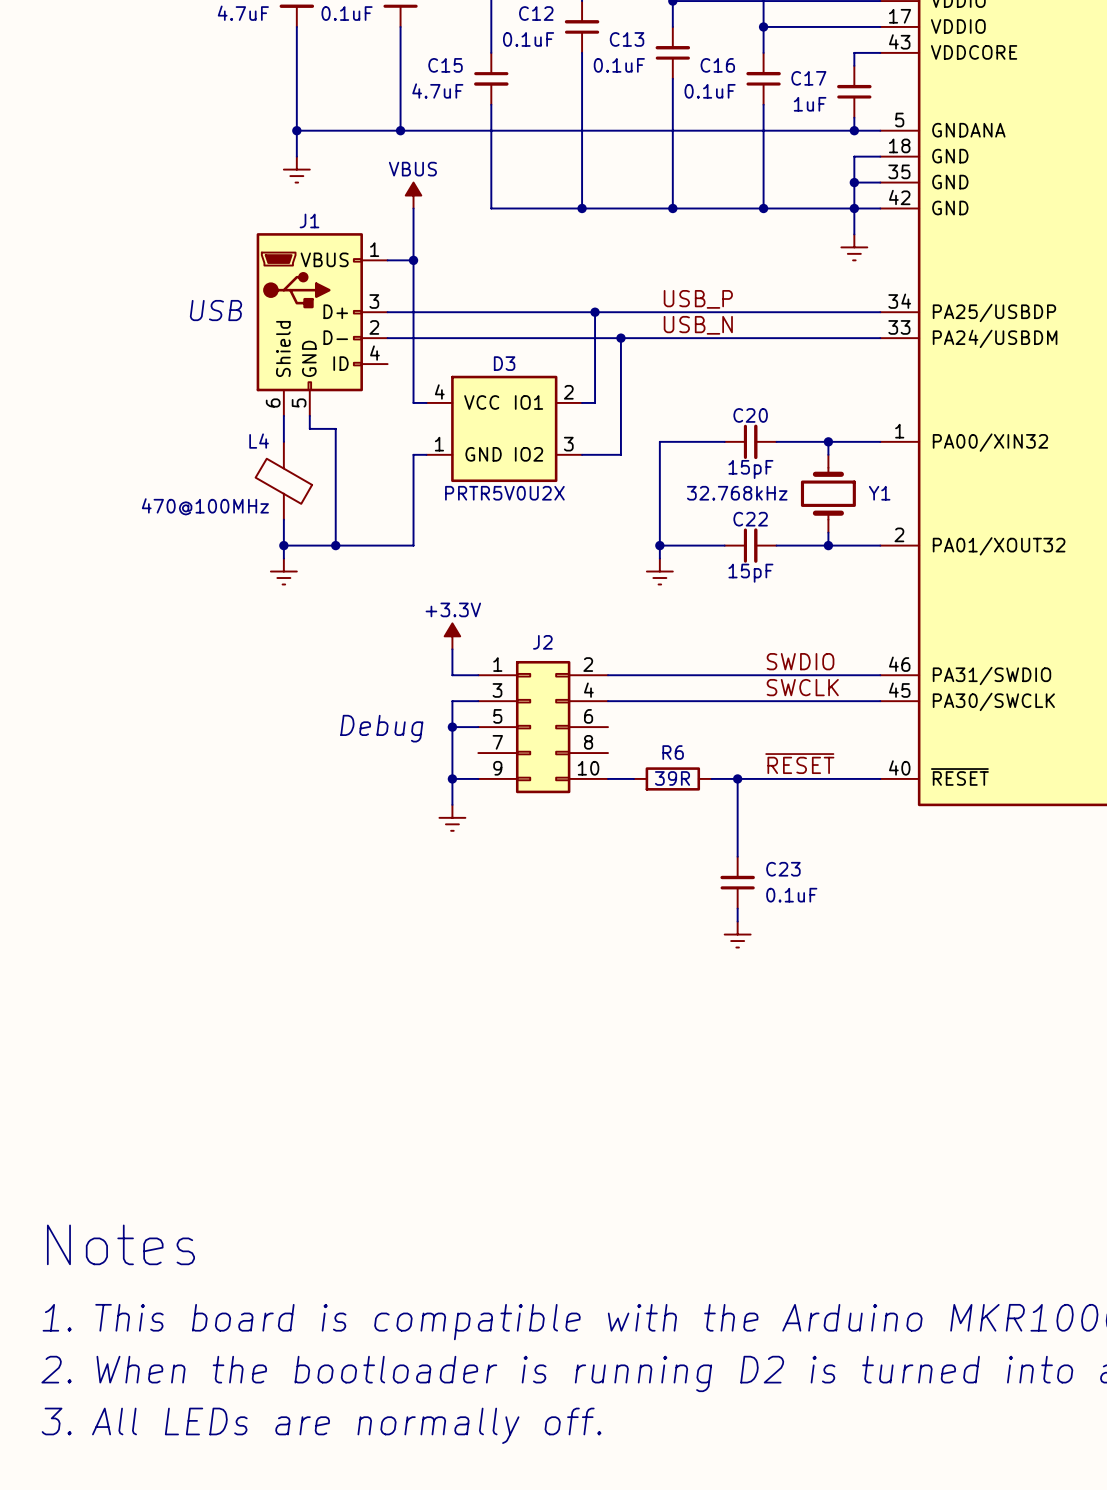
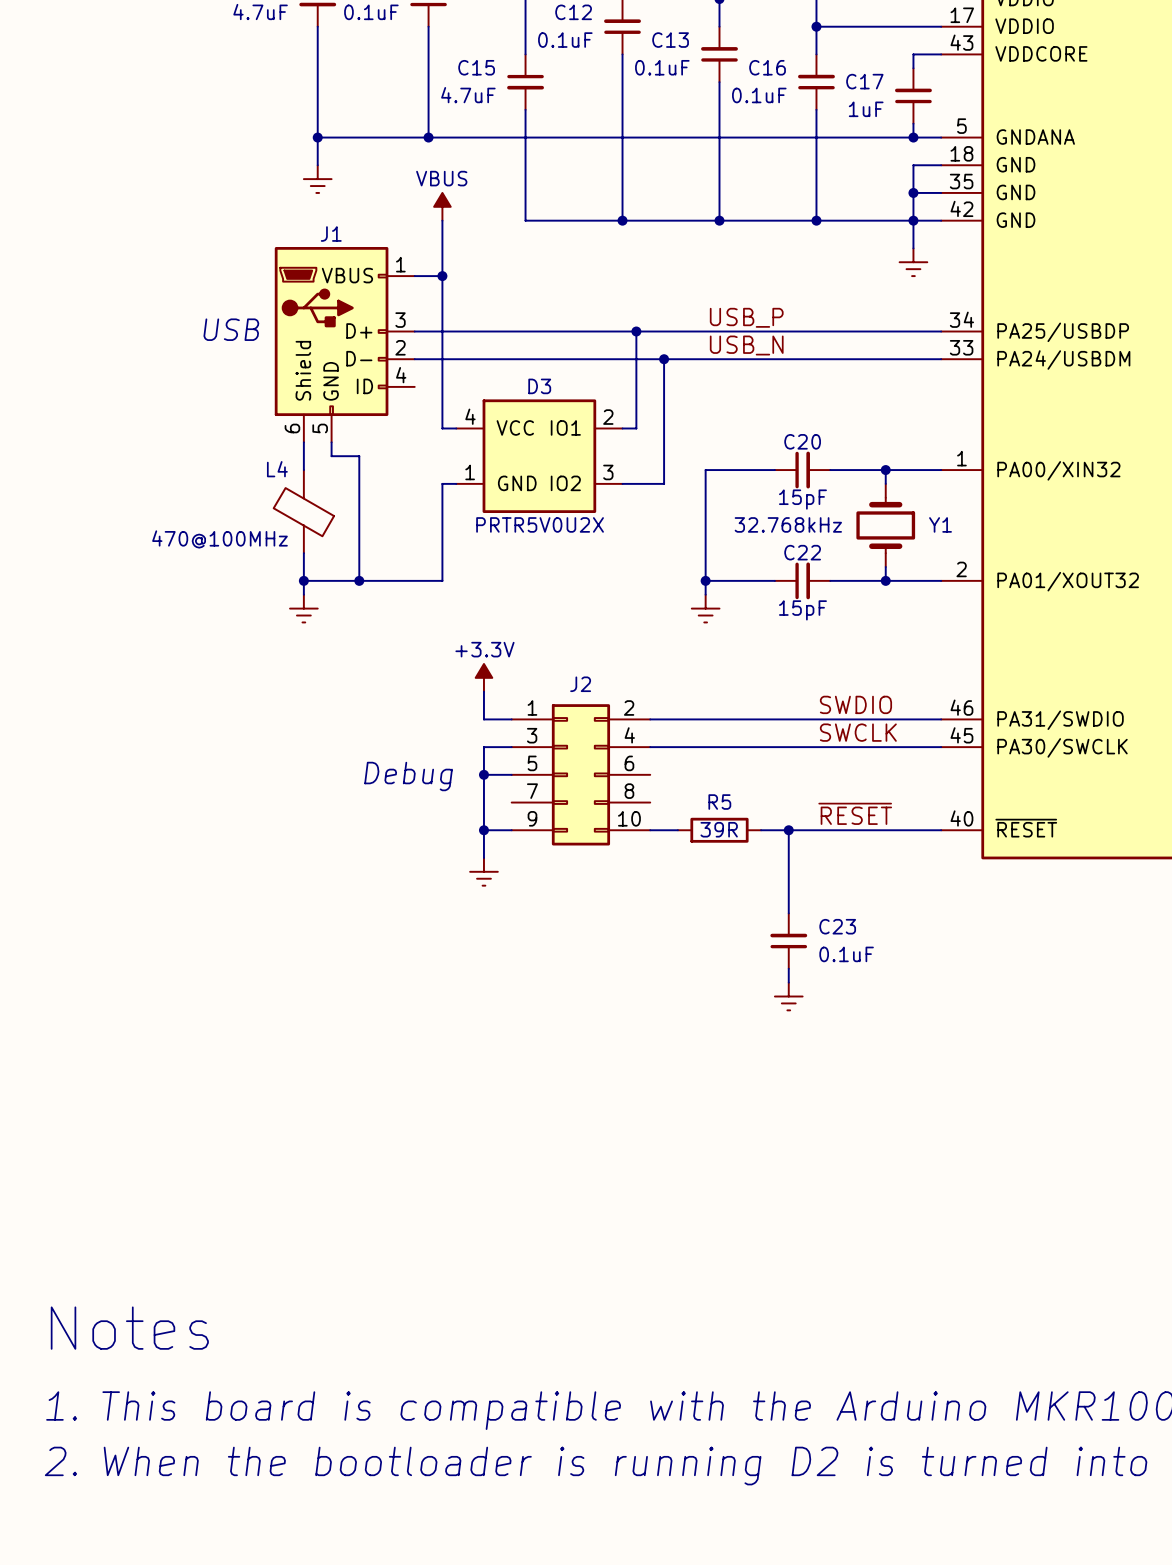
R6 name: R6 (673, 752) -> R5 (719, 802)
text: 3. (56, 1421) -> none
text: All LEDs are normally off. (346, 1425) -> none

